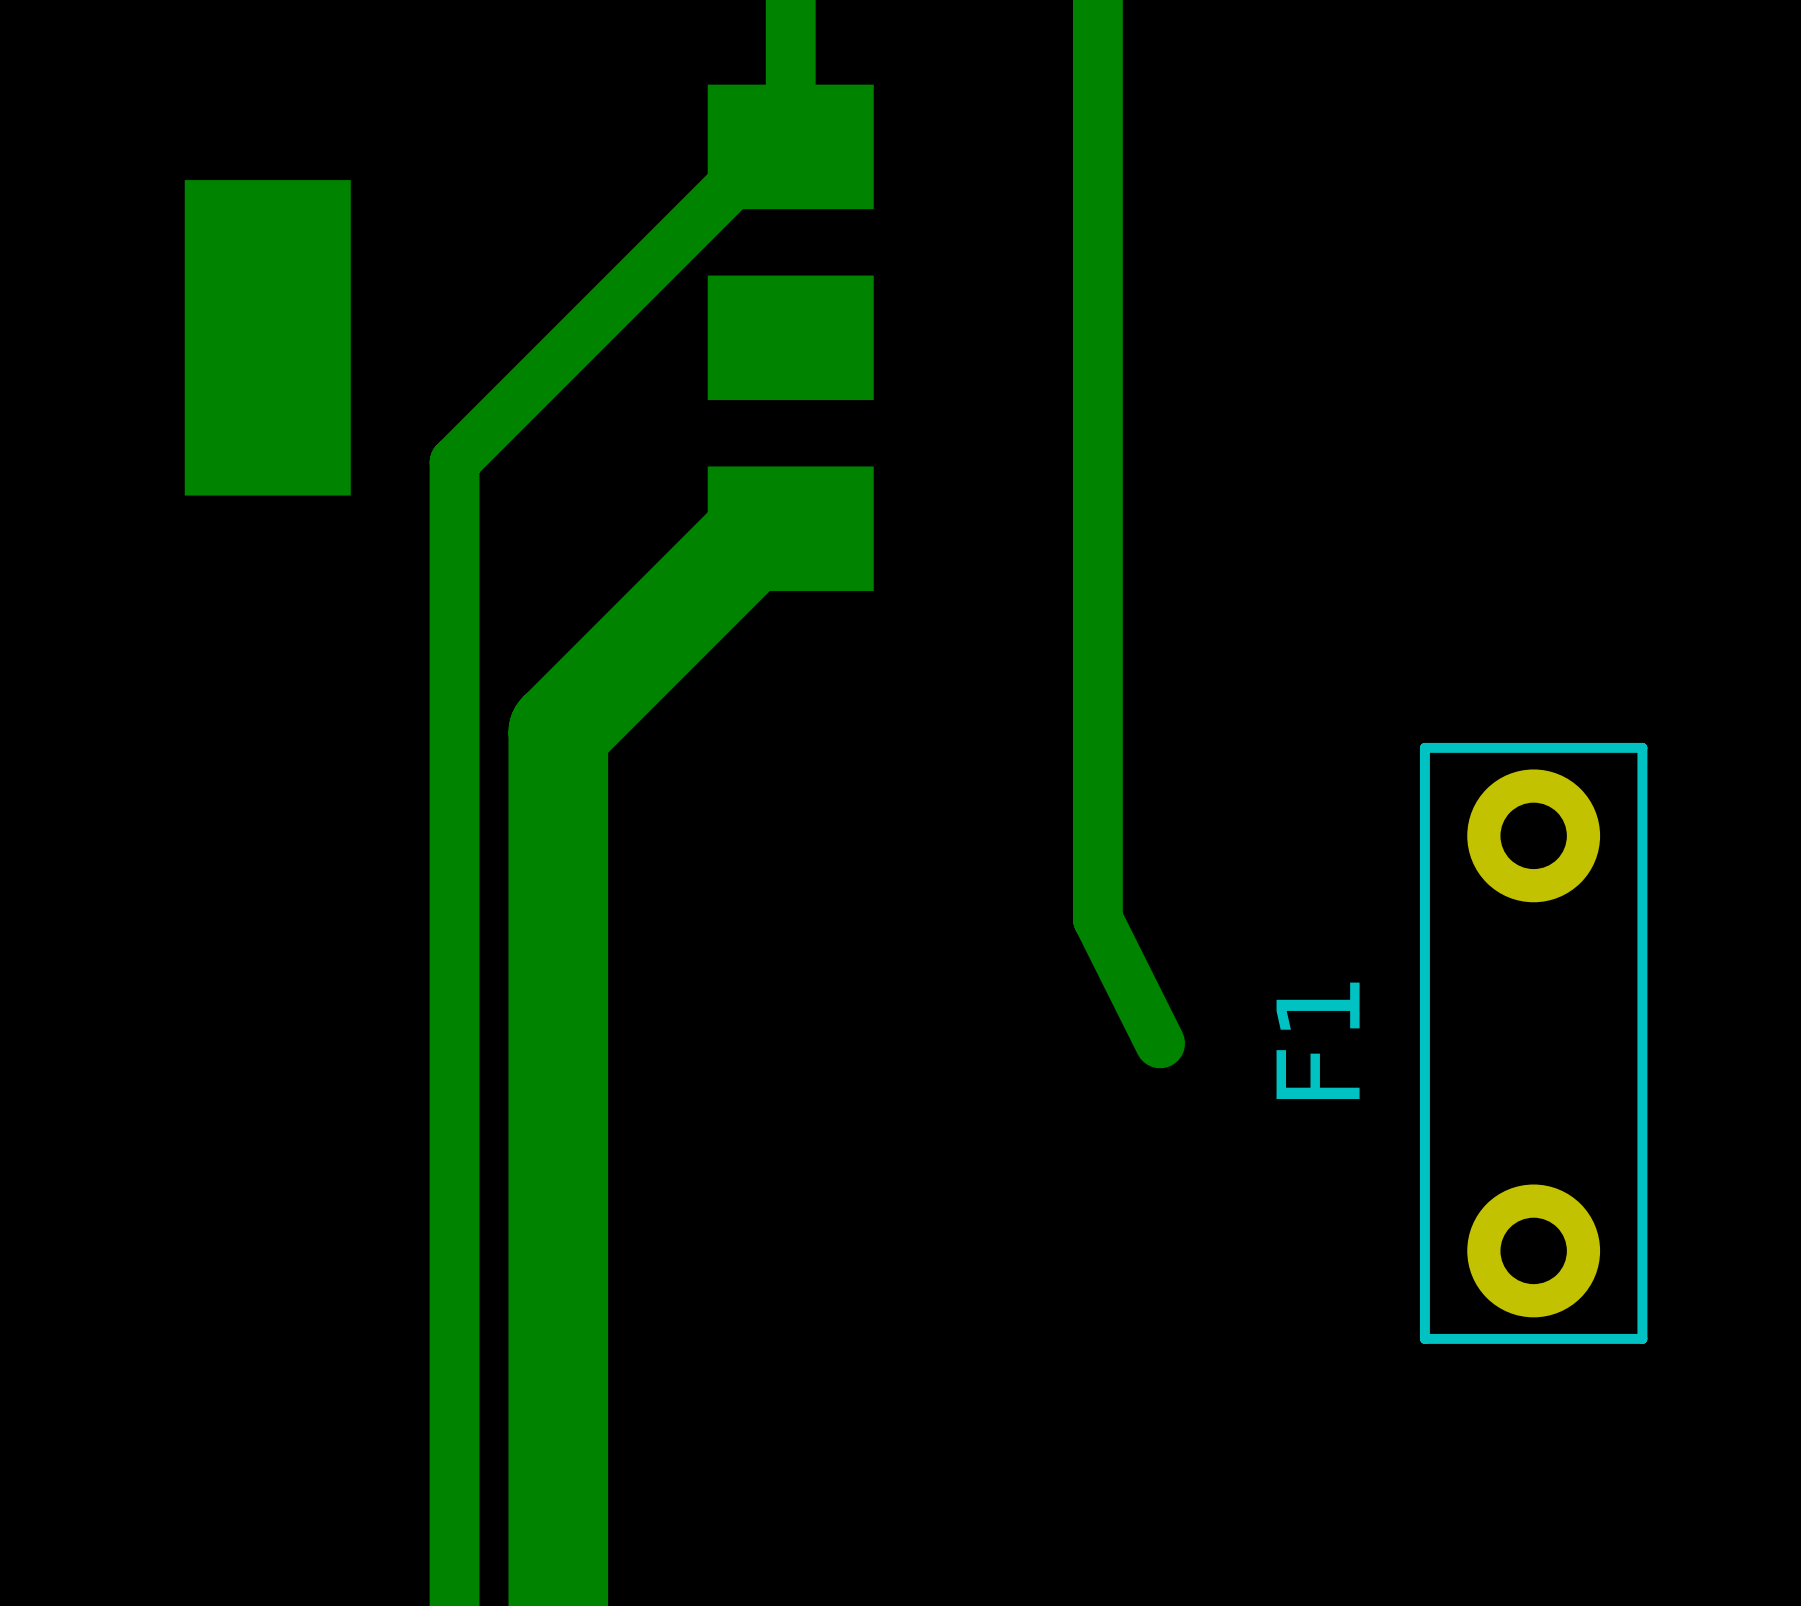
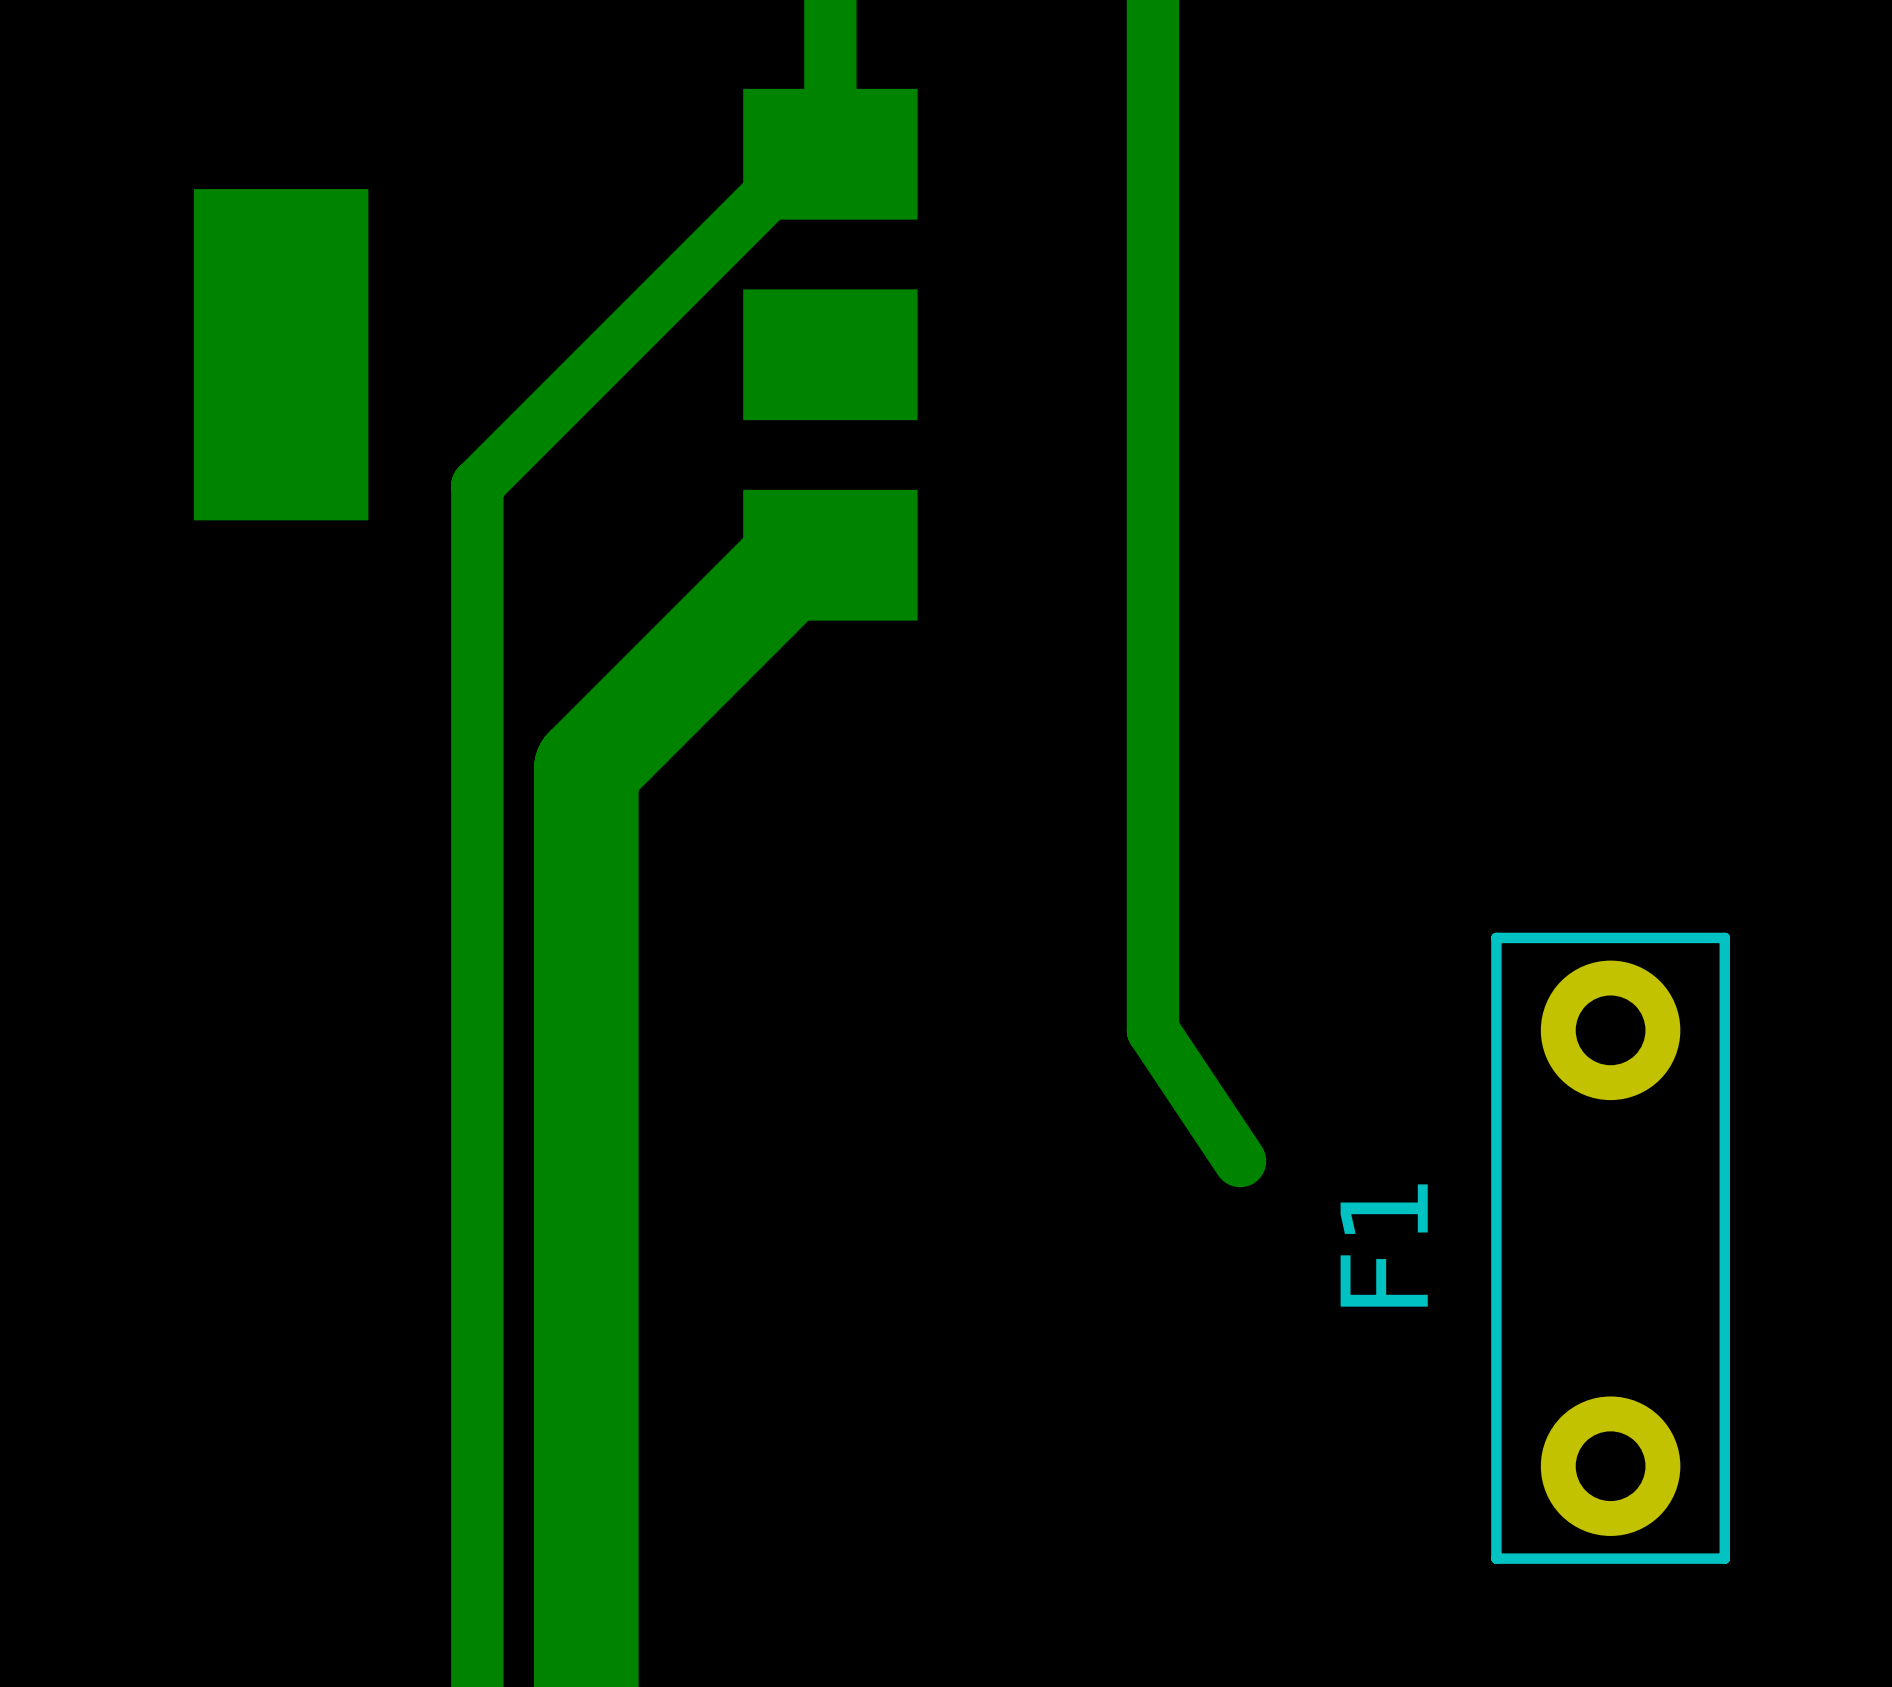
bottom track: (1097, 918) (1160, 1043) -> (1152, 964) (1152, 1030) (1240, 1161)
F1 position: (1533, 1043) -> (1610, 1248)

